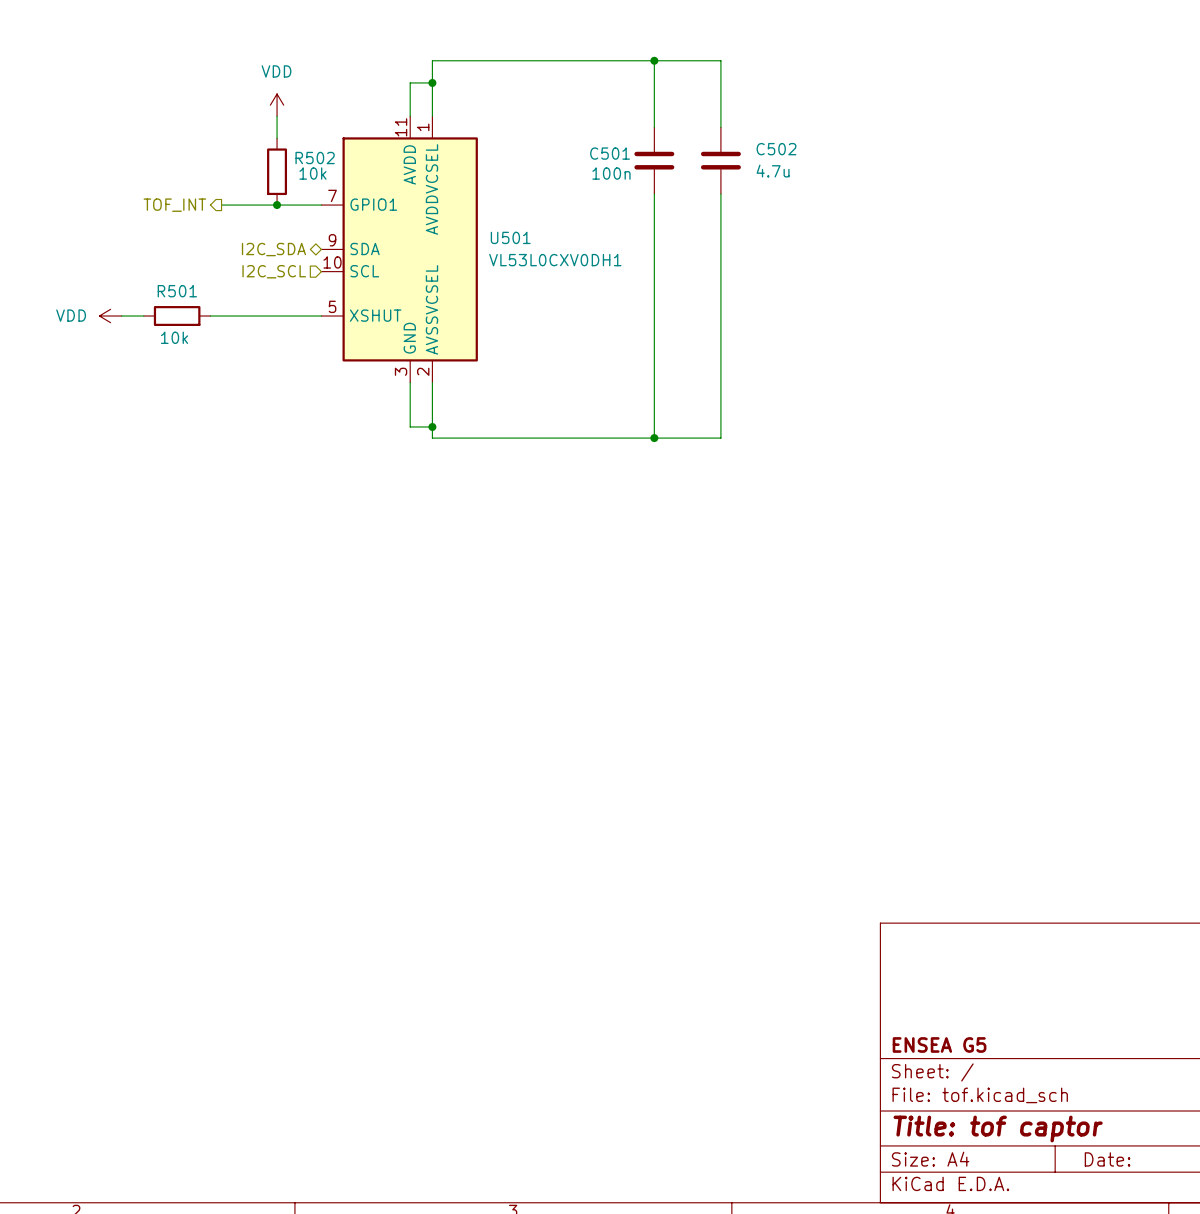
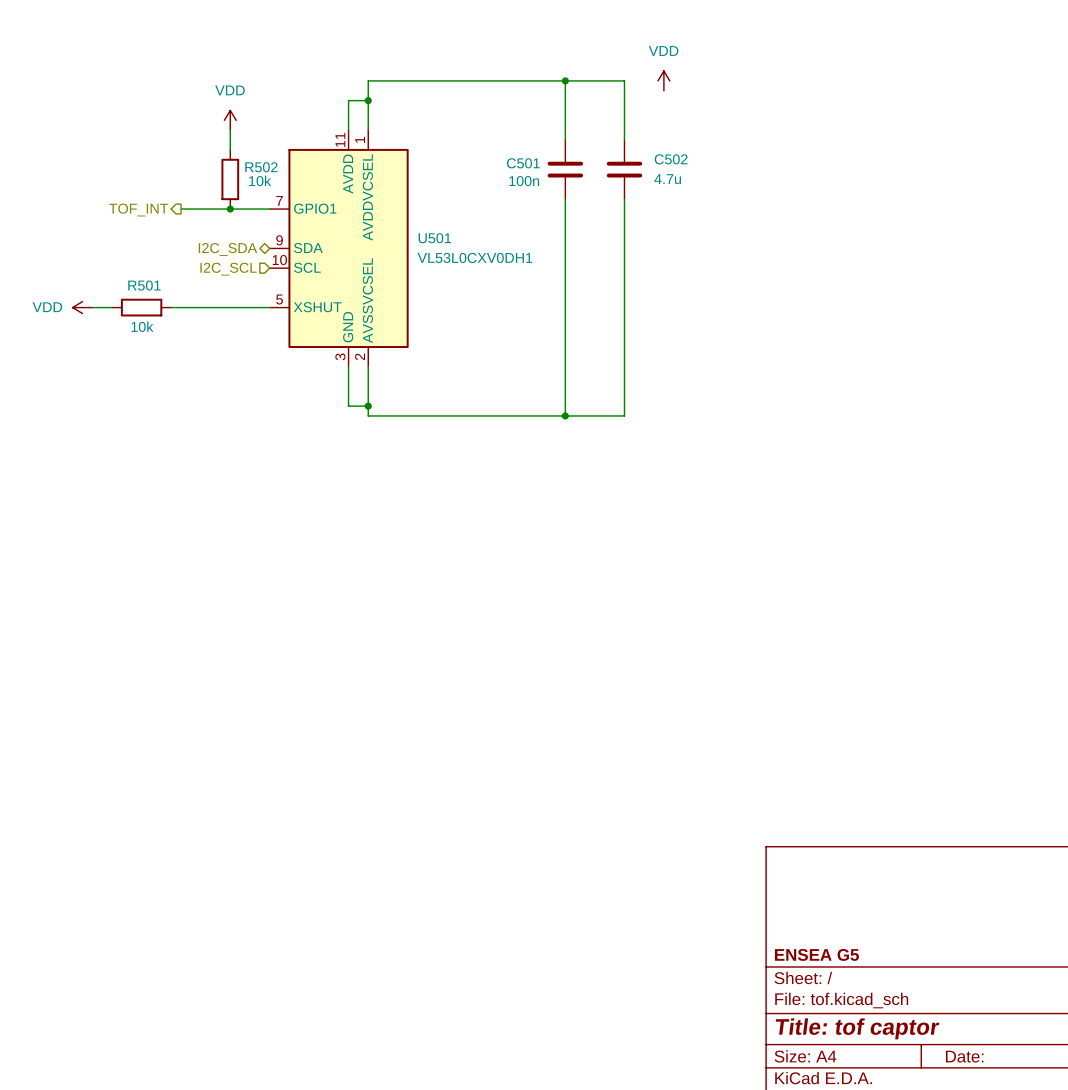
power symbol: none -> VDD (663, 80)

